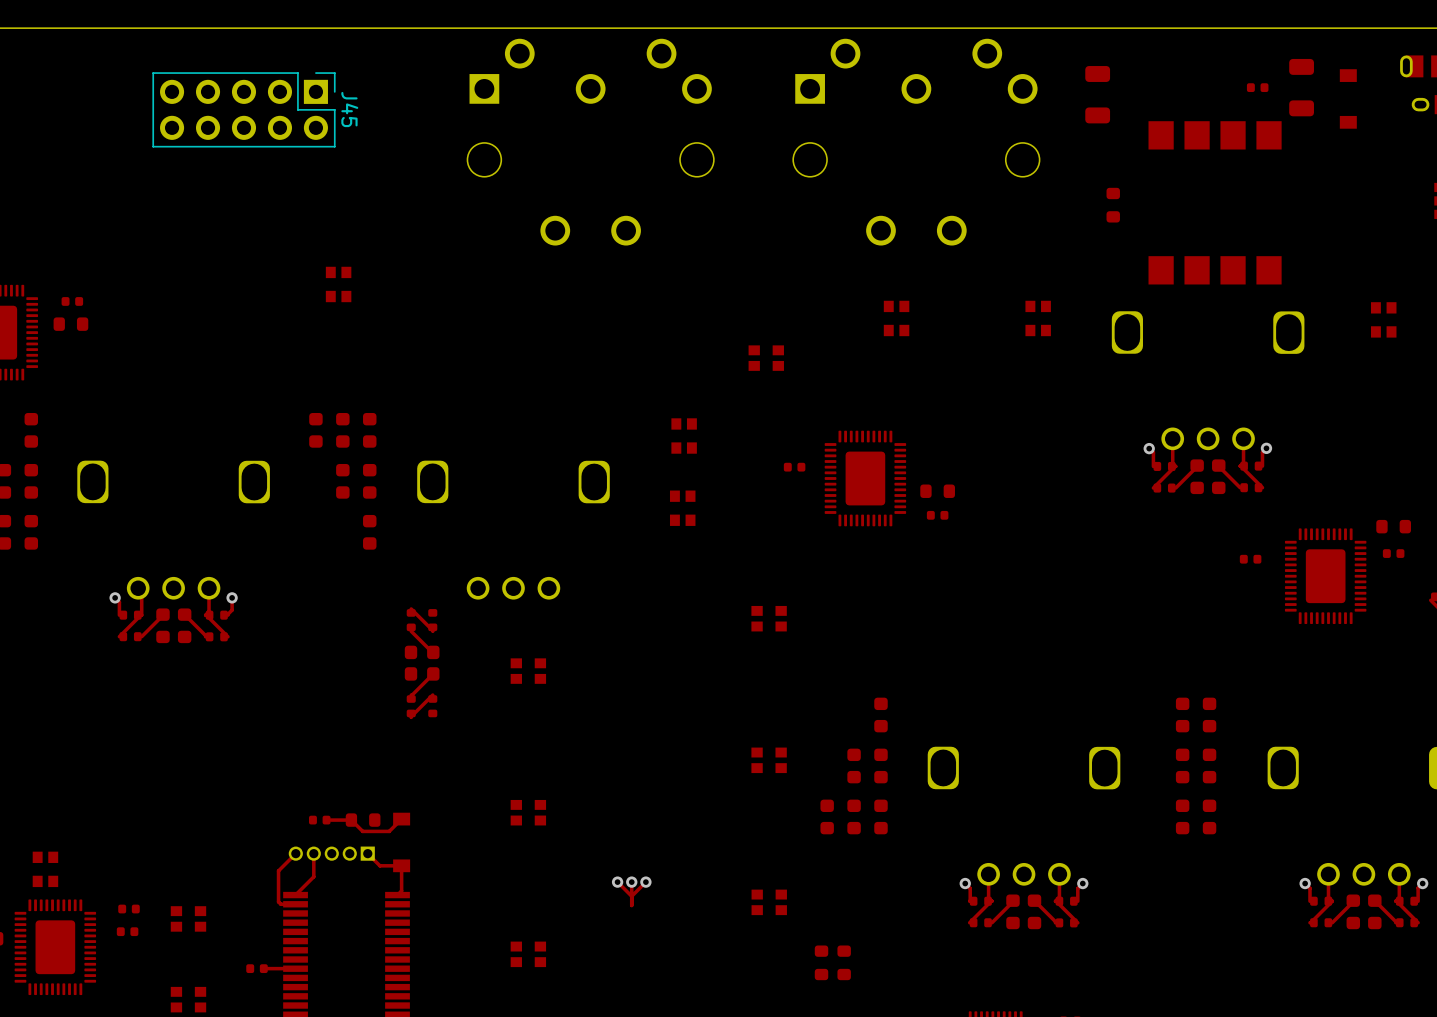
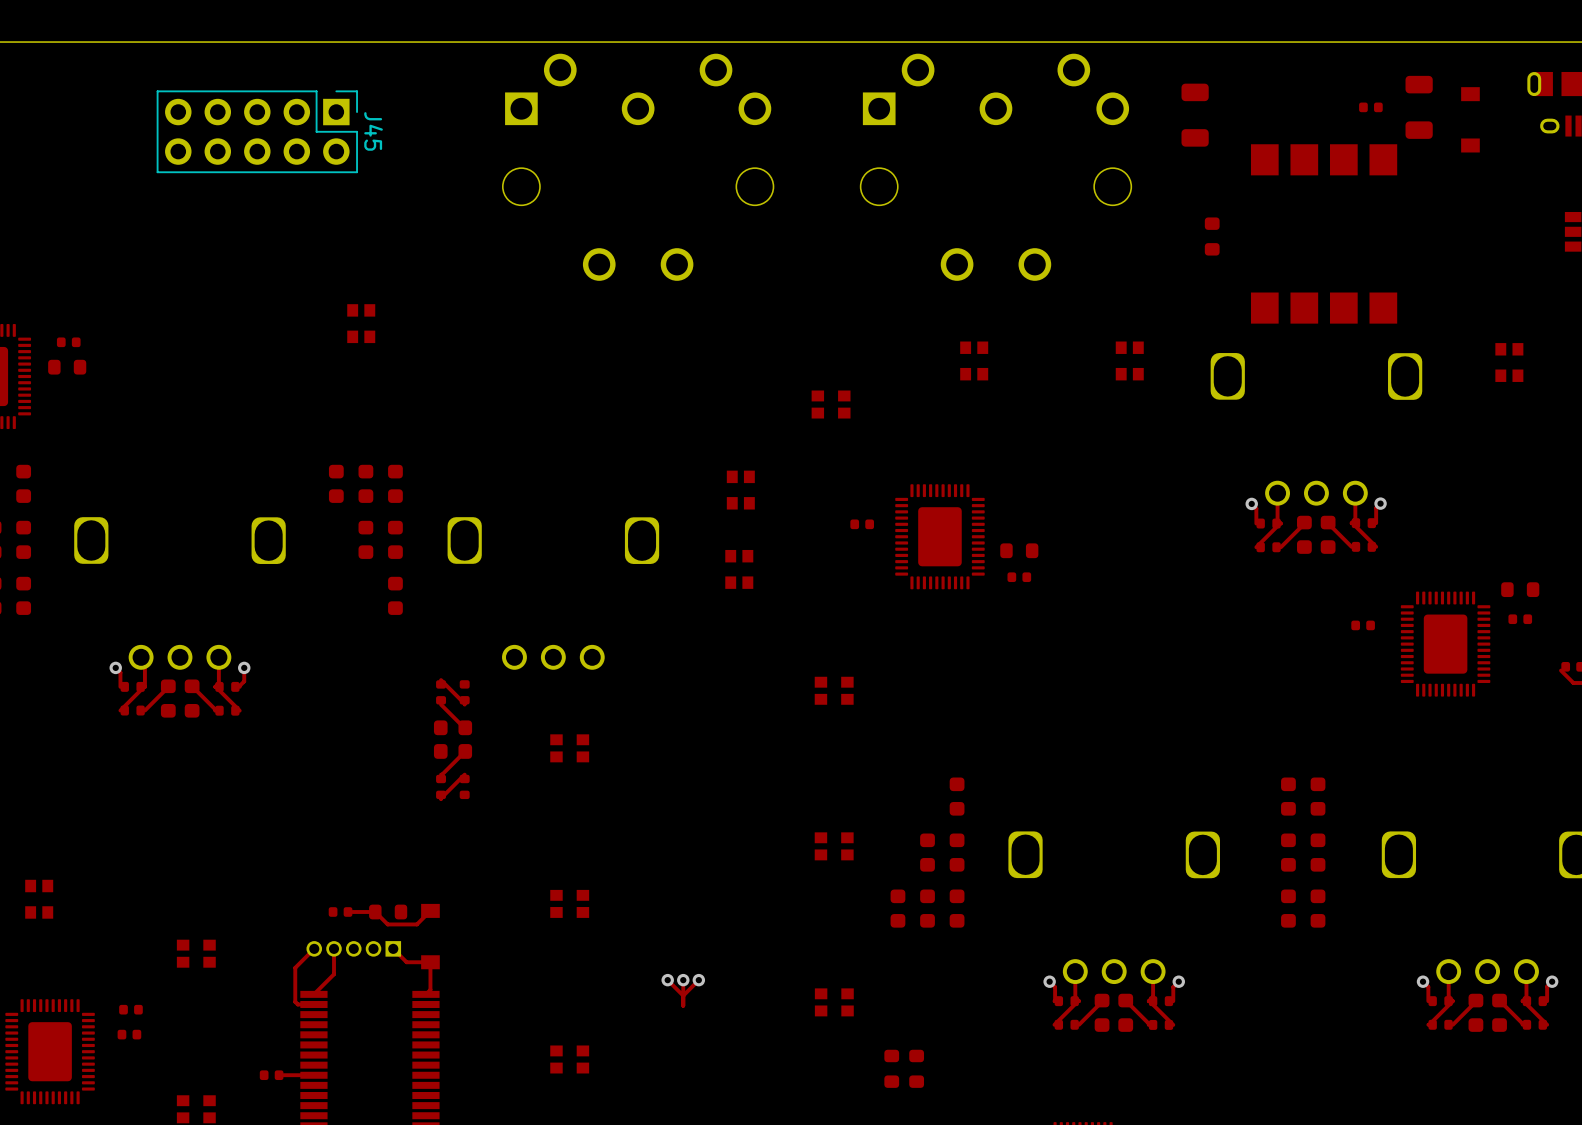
part position: (45, 869) -> (39, 899)
part position: (188, 918) -> (196, 953)

